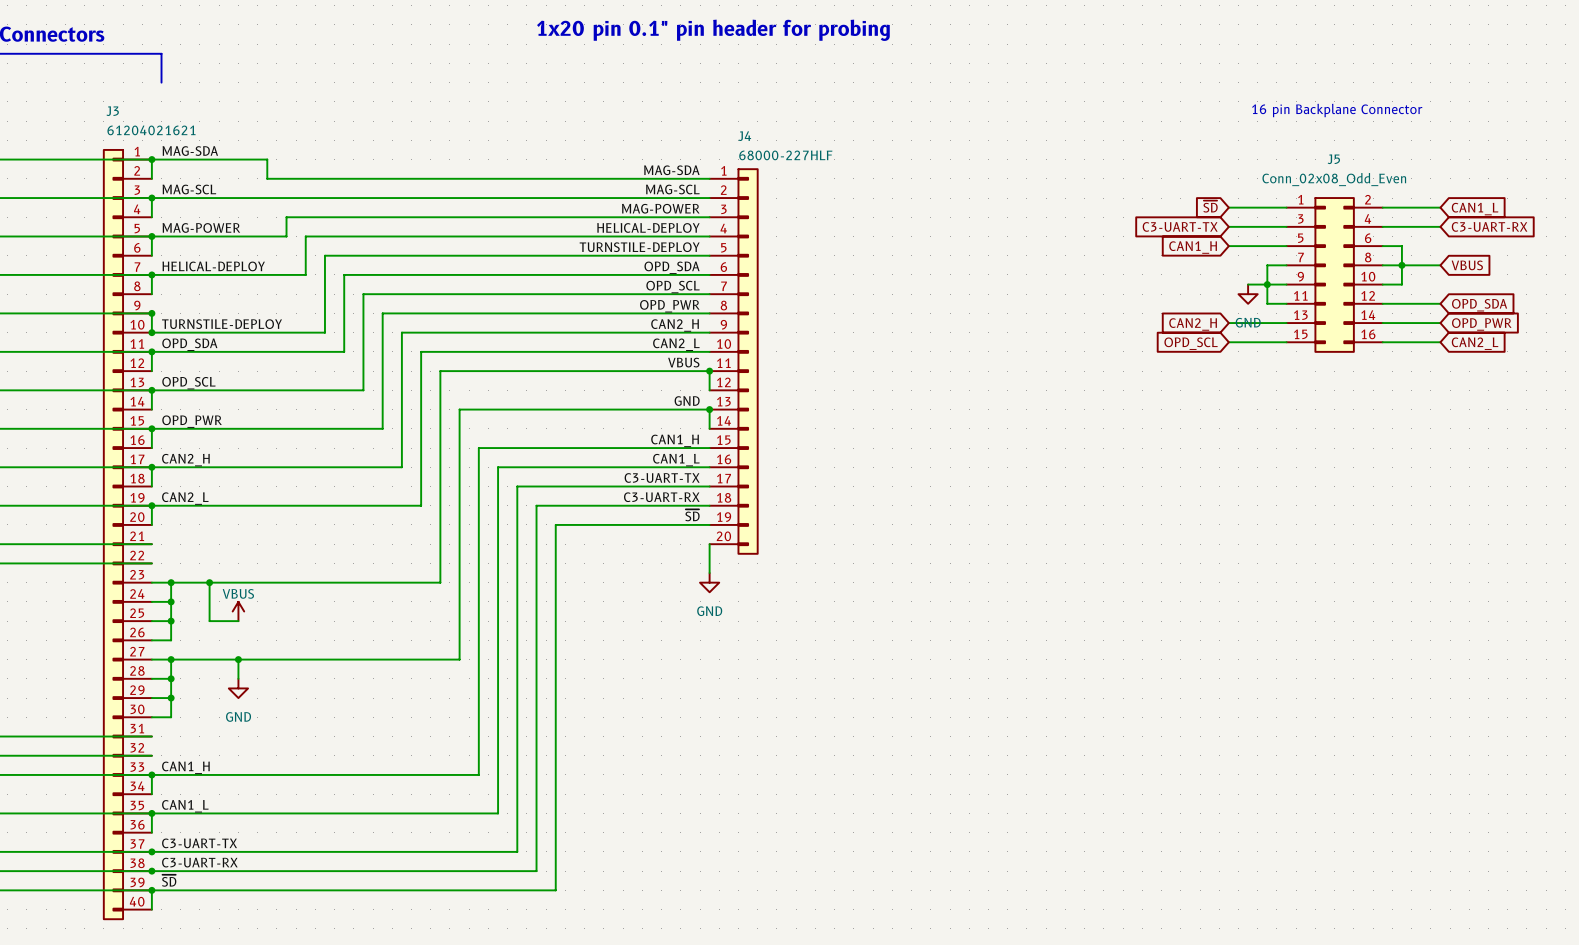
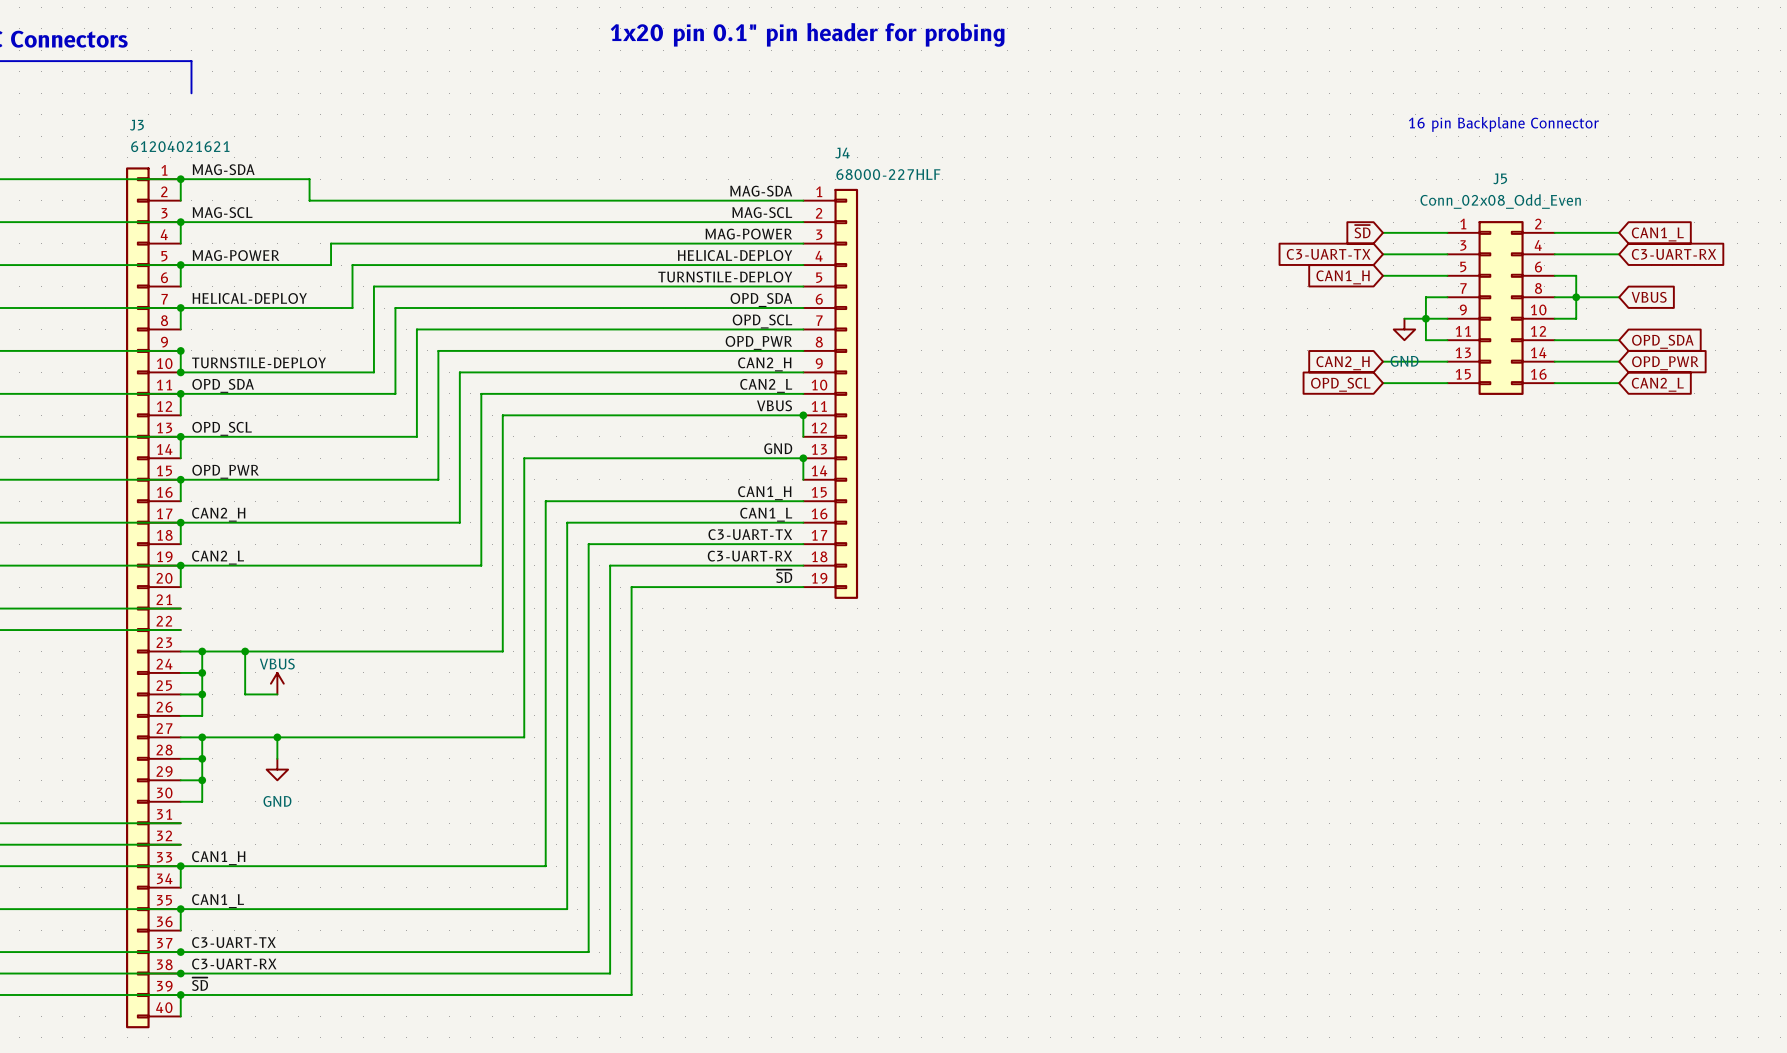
J4 symbol: [709, 168, 759, 555] -> [803, 188, 859, 599]
wire: (709, 544) (709, 573) -> none
power symbol: GND (709, 582) -> none

